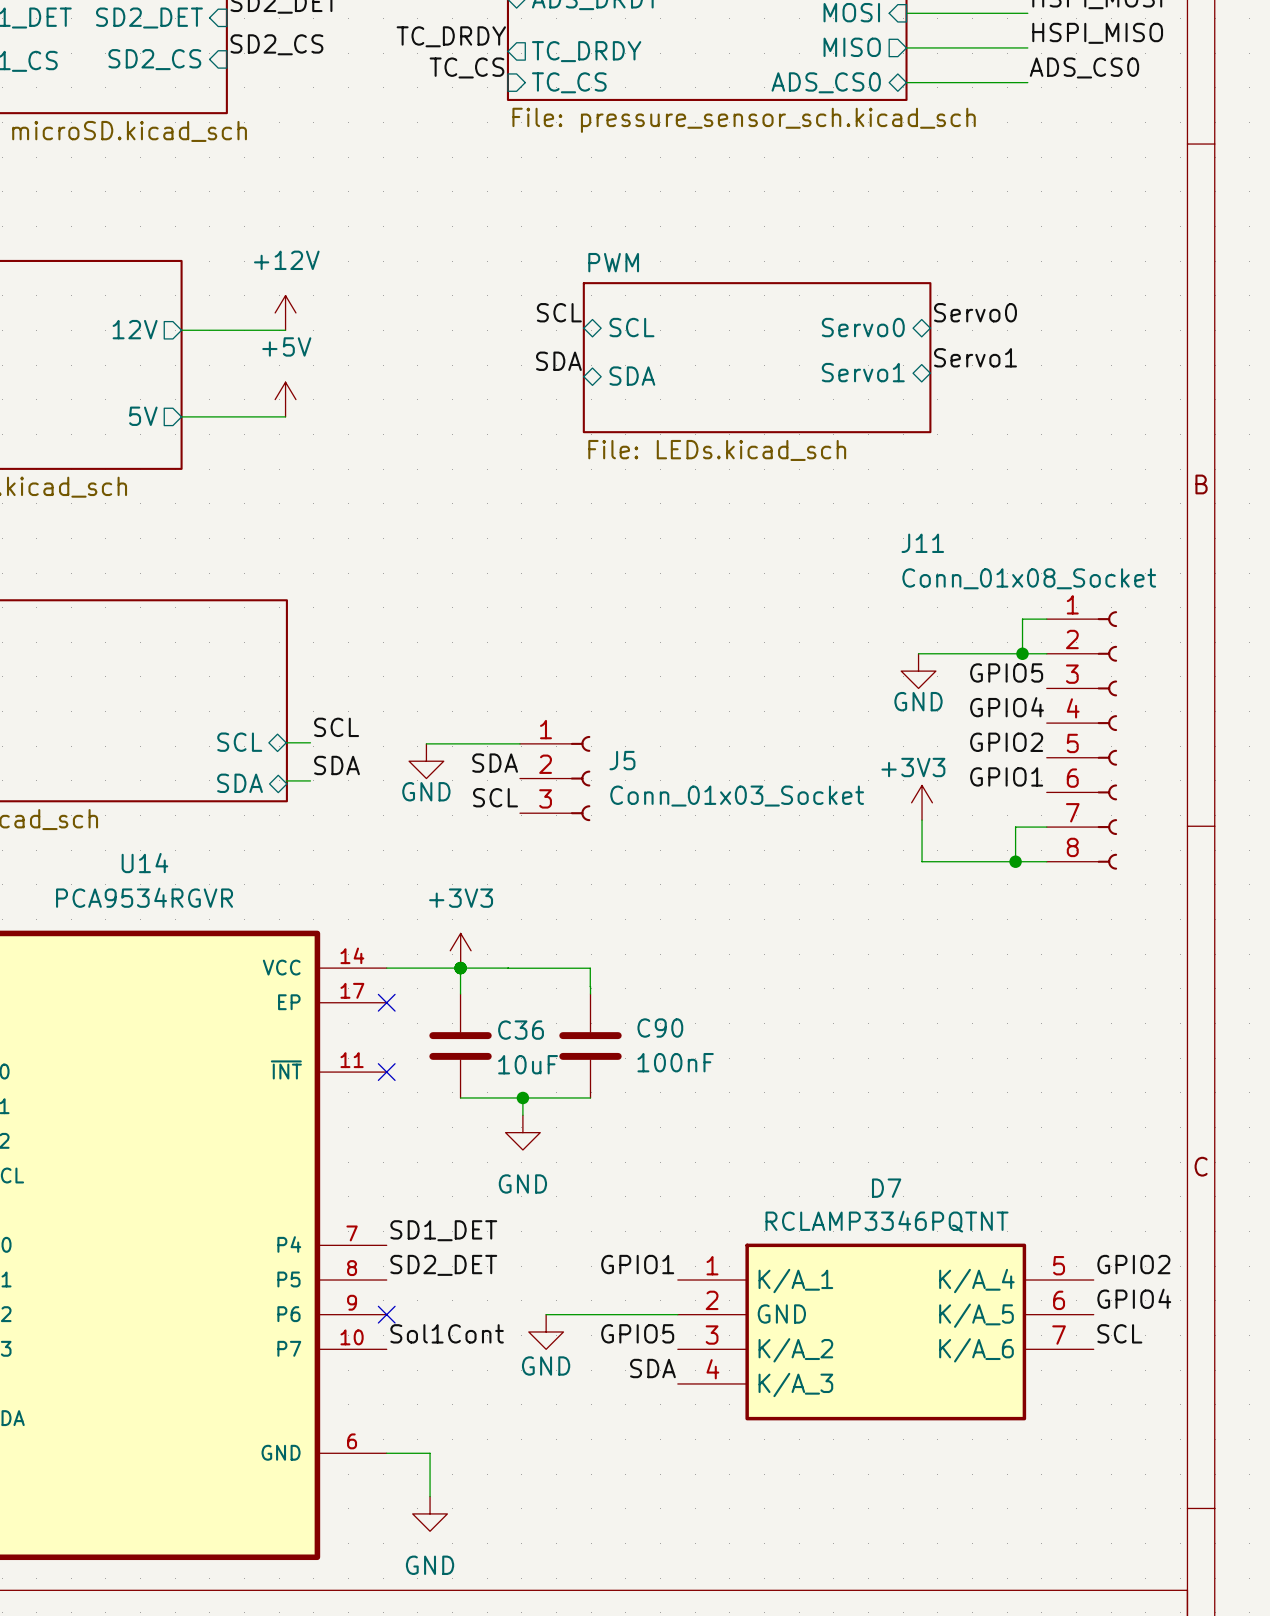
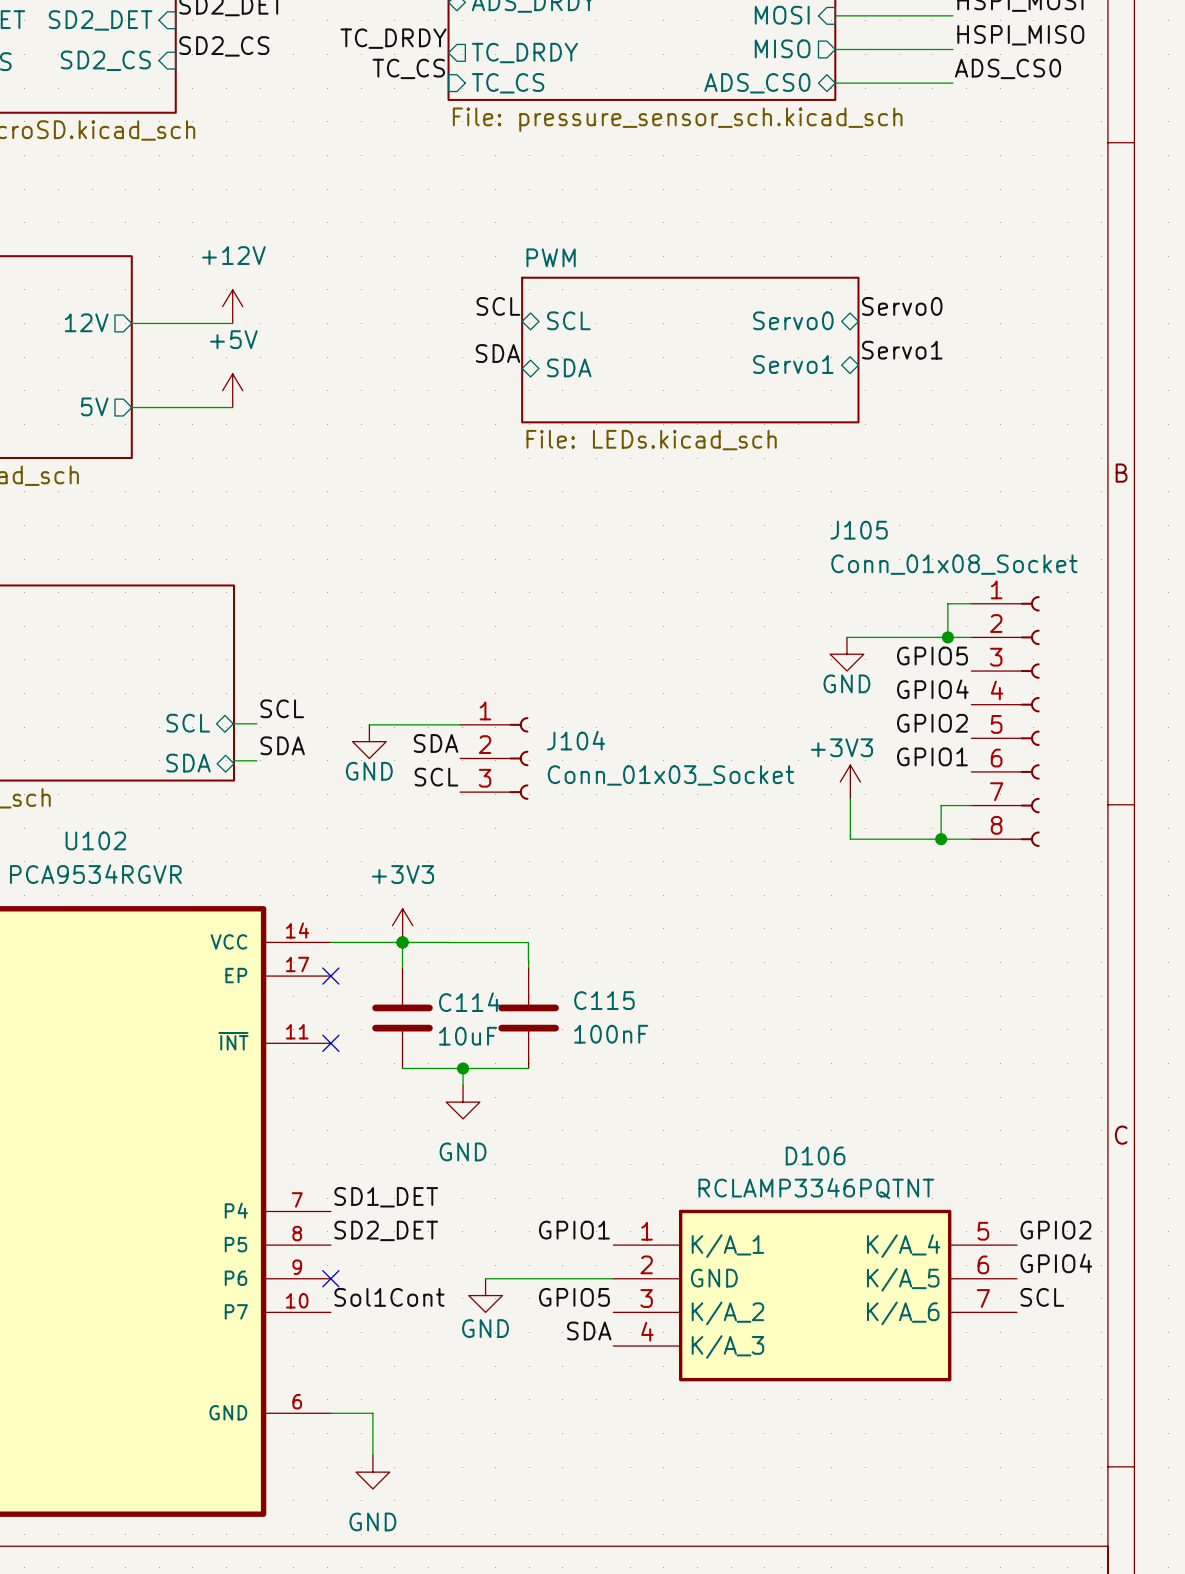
J11 name: J11 (922, 543) -> J105 (859, 530)
J5 name: J5 (622, 760) -> J104 (576, 740)
U14 name: U14 (144, 863) -> U102 (95, 840)
C90 name: C90 (660, 1028) -> C115 (604, 1000)
C36 name: C36 (521, 1030) -> C114 (469, 1002)
D7 name: D7 (886, 1188) -> D106 (815, 1155)

